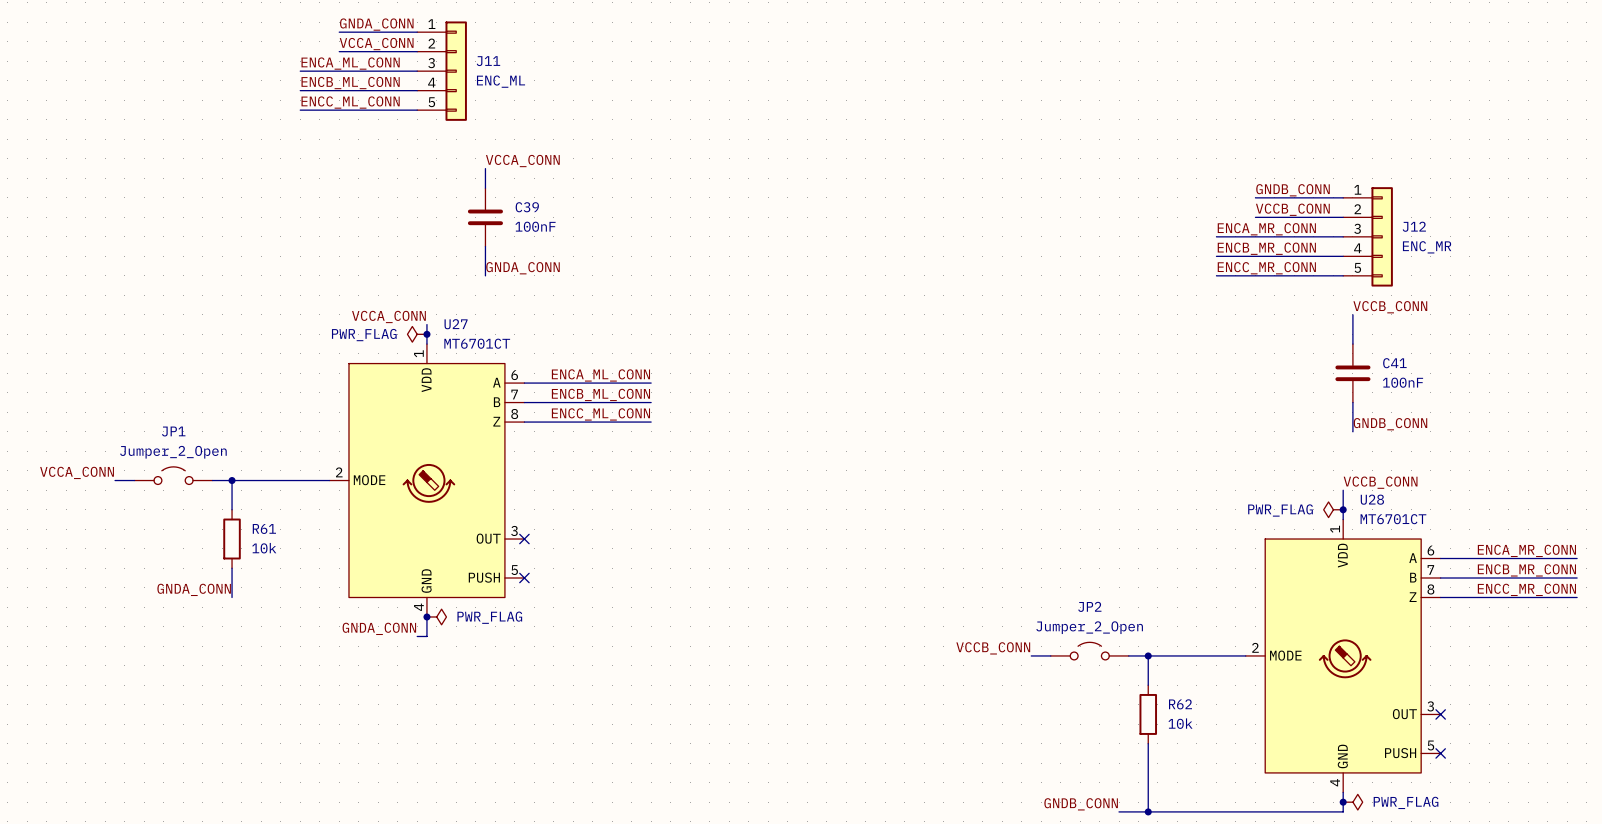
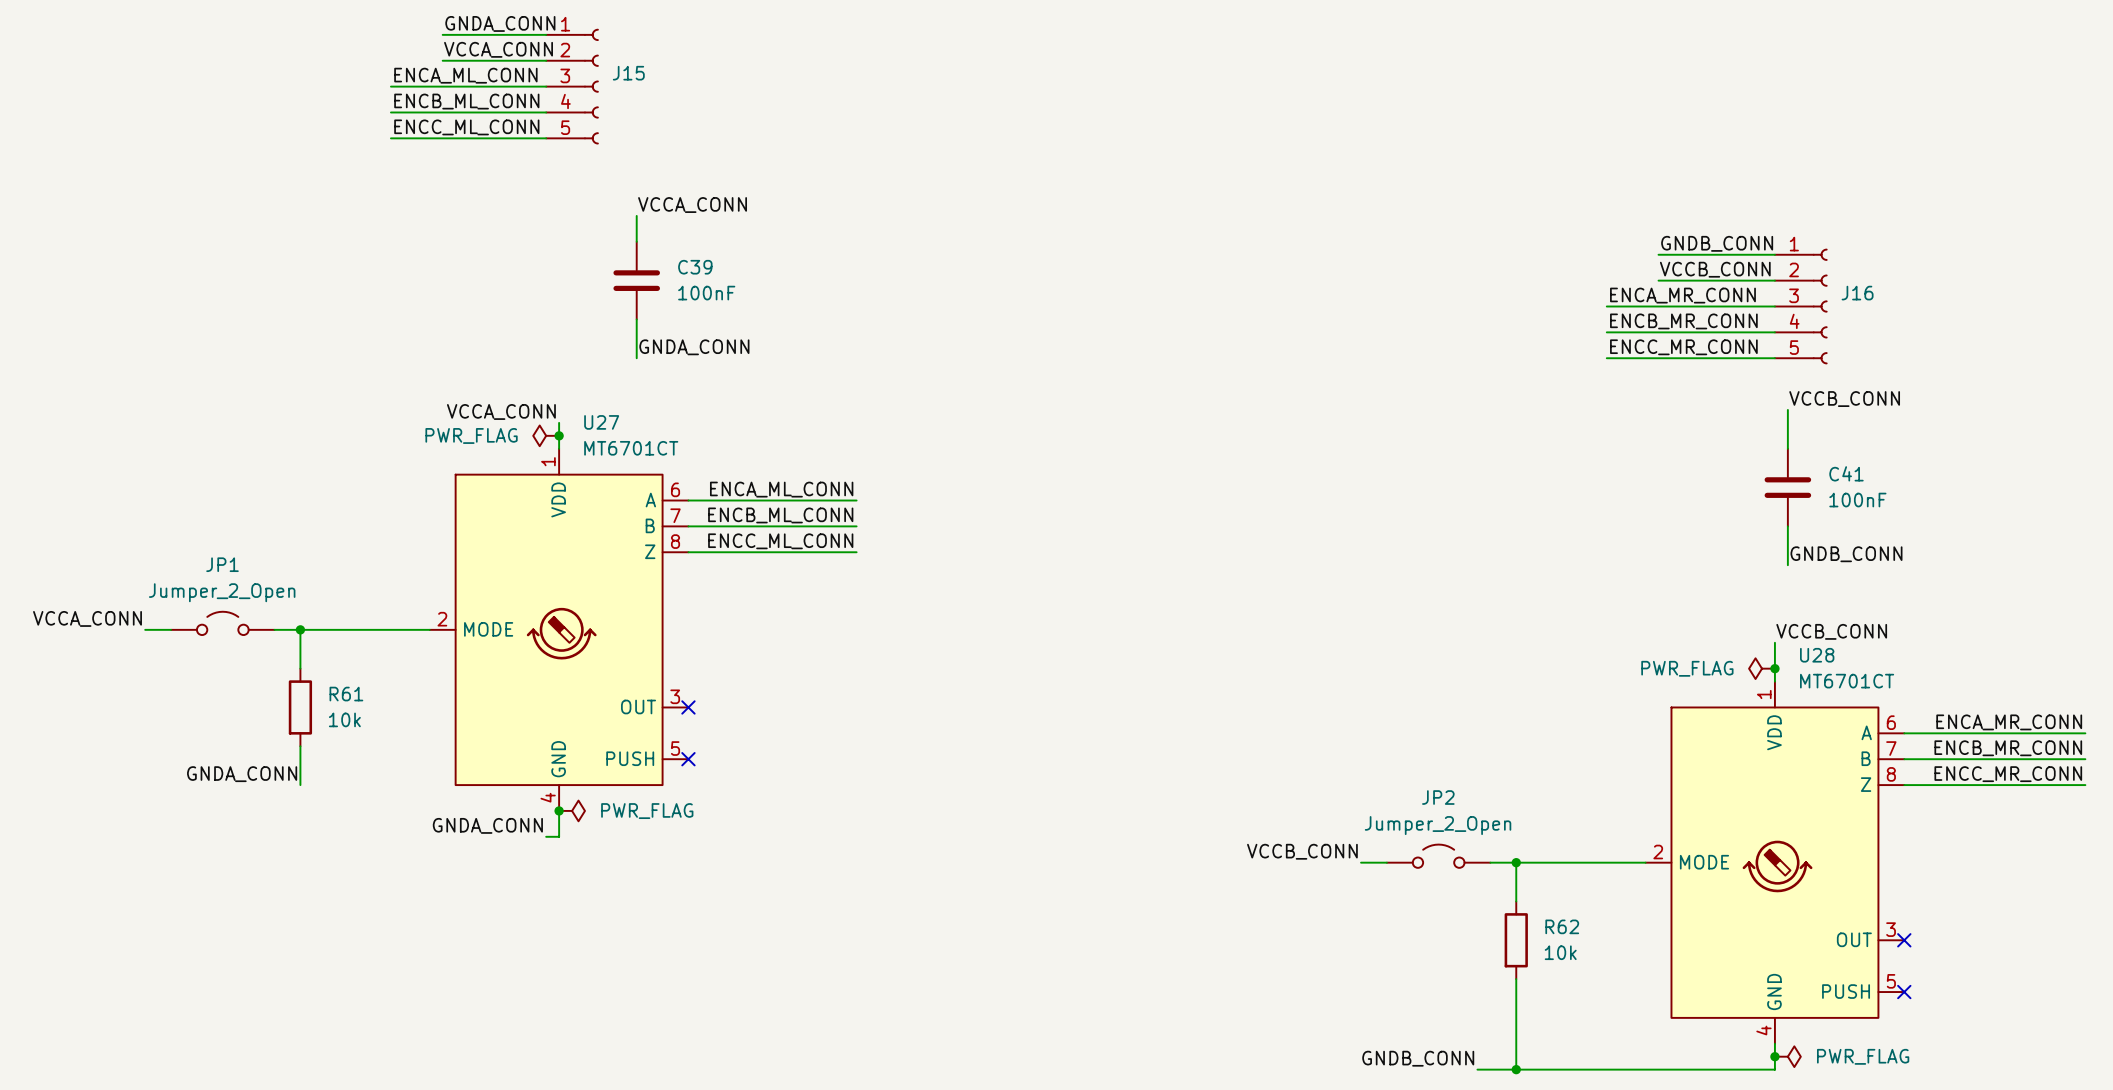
J15: none -> (572, 86)
J11: ENC_ML (442, 71) -> none
J16: none -> (1801, 306)
J12: ENC_MR (1368, 236) -> none

